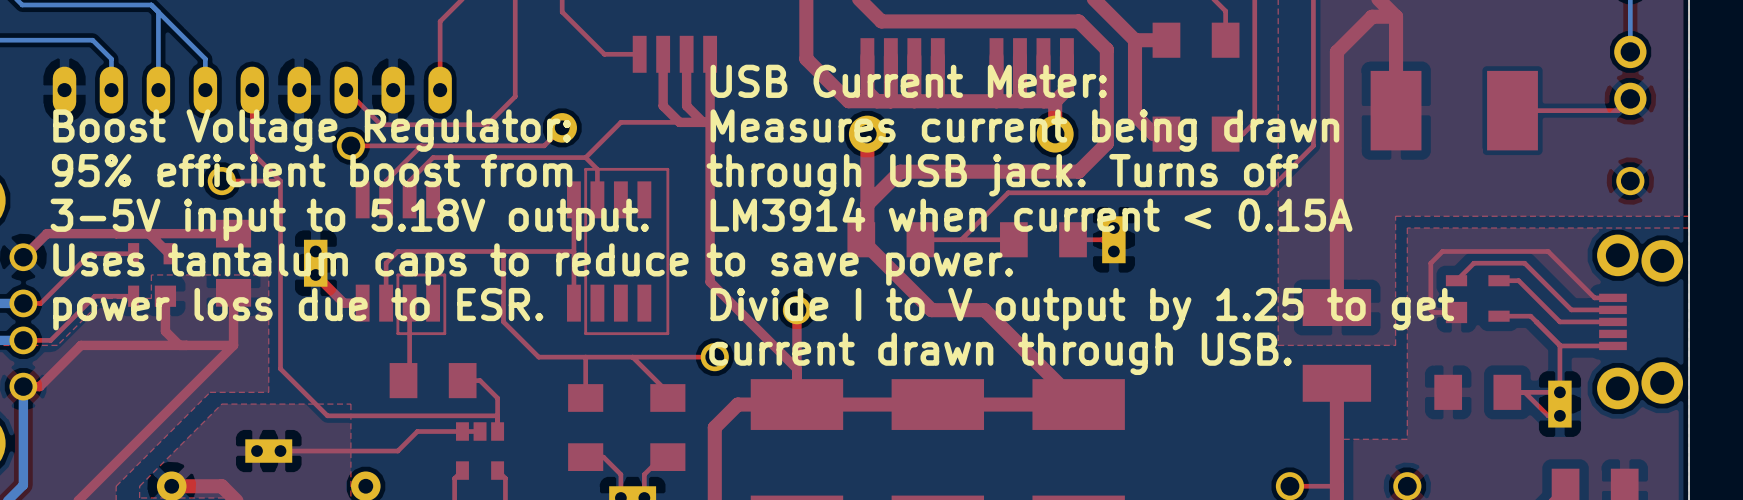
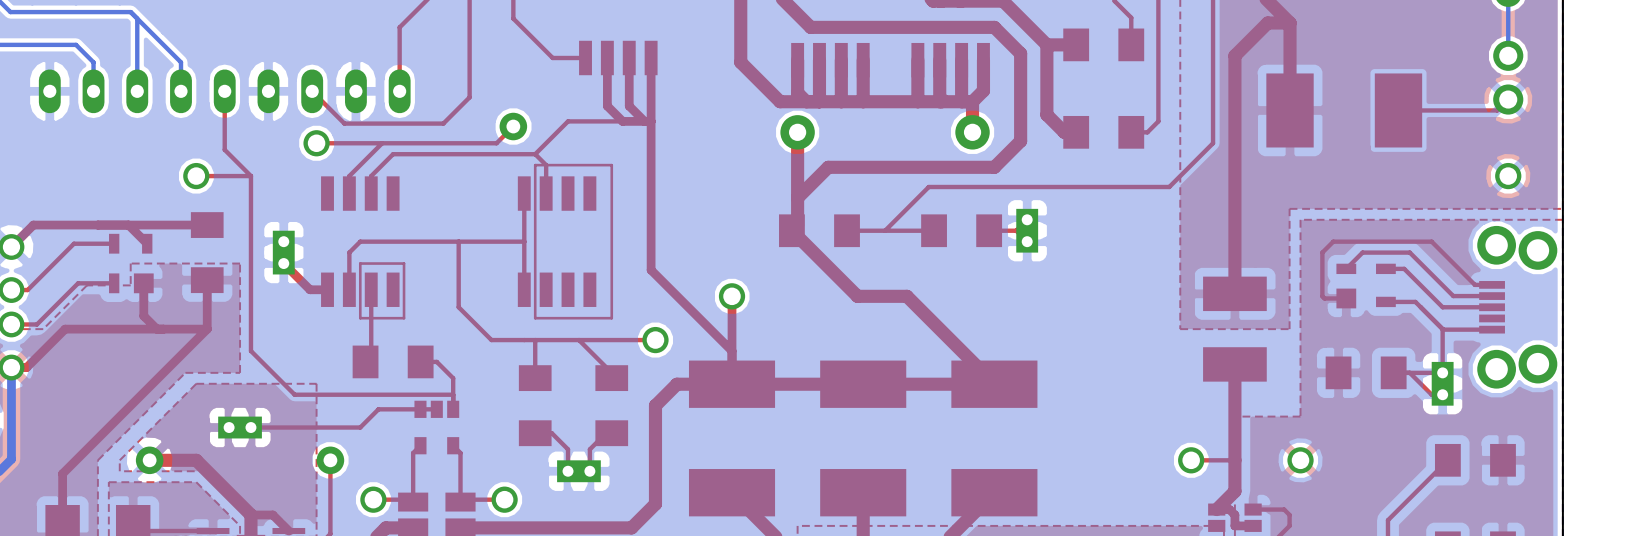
text: USB Current Meter: (908, 81) -> none
text: Boost Voltage Regulator: (312, 130) -> none
text: Measures current being drawn (1024, 130) -> none
text: 95% efficient boost from (312, 170) -> none
text: through USB jack. Turns off (1002, 175) -> none
text: LM3914 when current < 0.15A (1031, 214) -> none
text: 3-5V input to 5.18V output. (349, 219) -> none
text: Uses tantalum caps to reduce (370, 264) -> none
text: to save power. (859, 264) -> none
text: power loss due to ESR. (298, 309) -> none
text: Divide I to V output by 1.25 to get (1082, 309) -> none
text: current drawn through USB. (1000, 353) -> none

